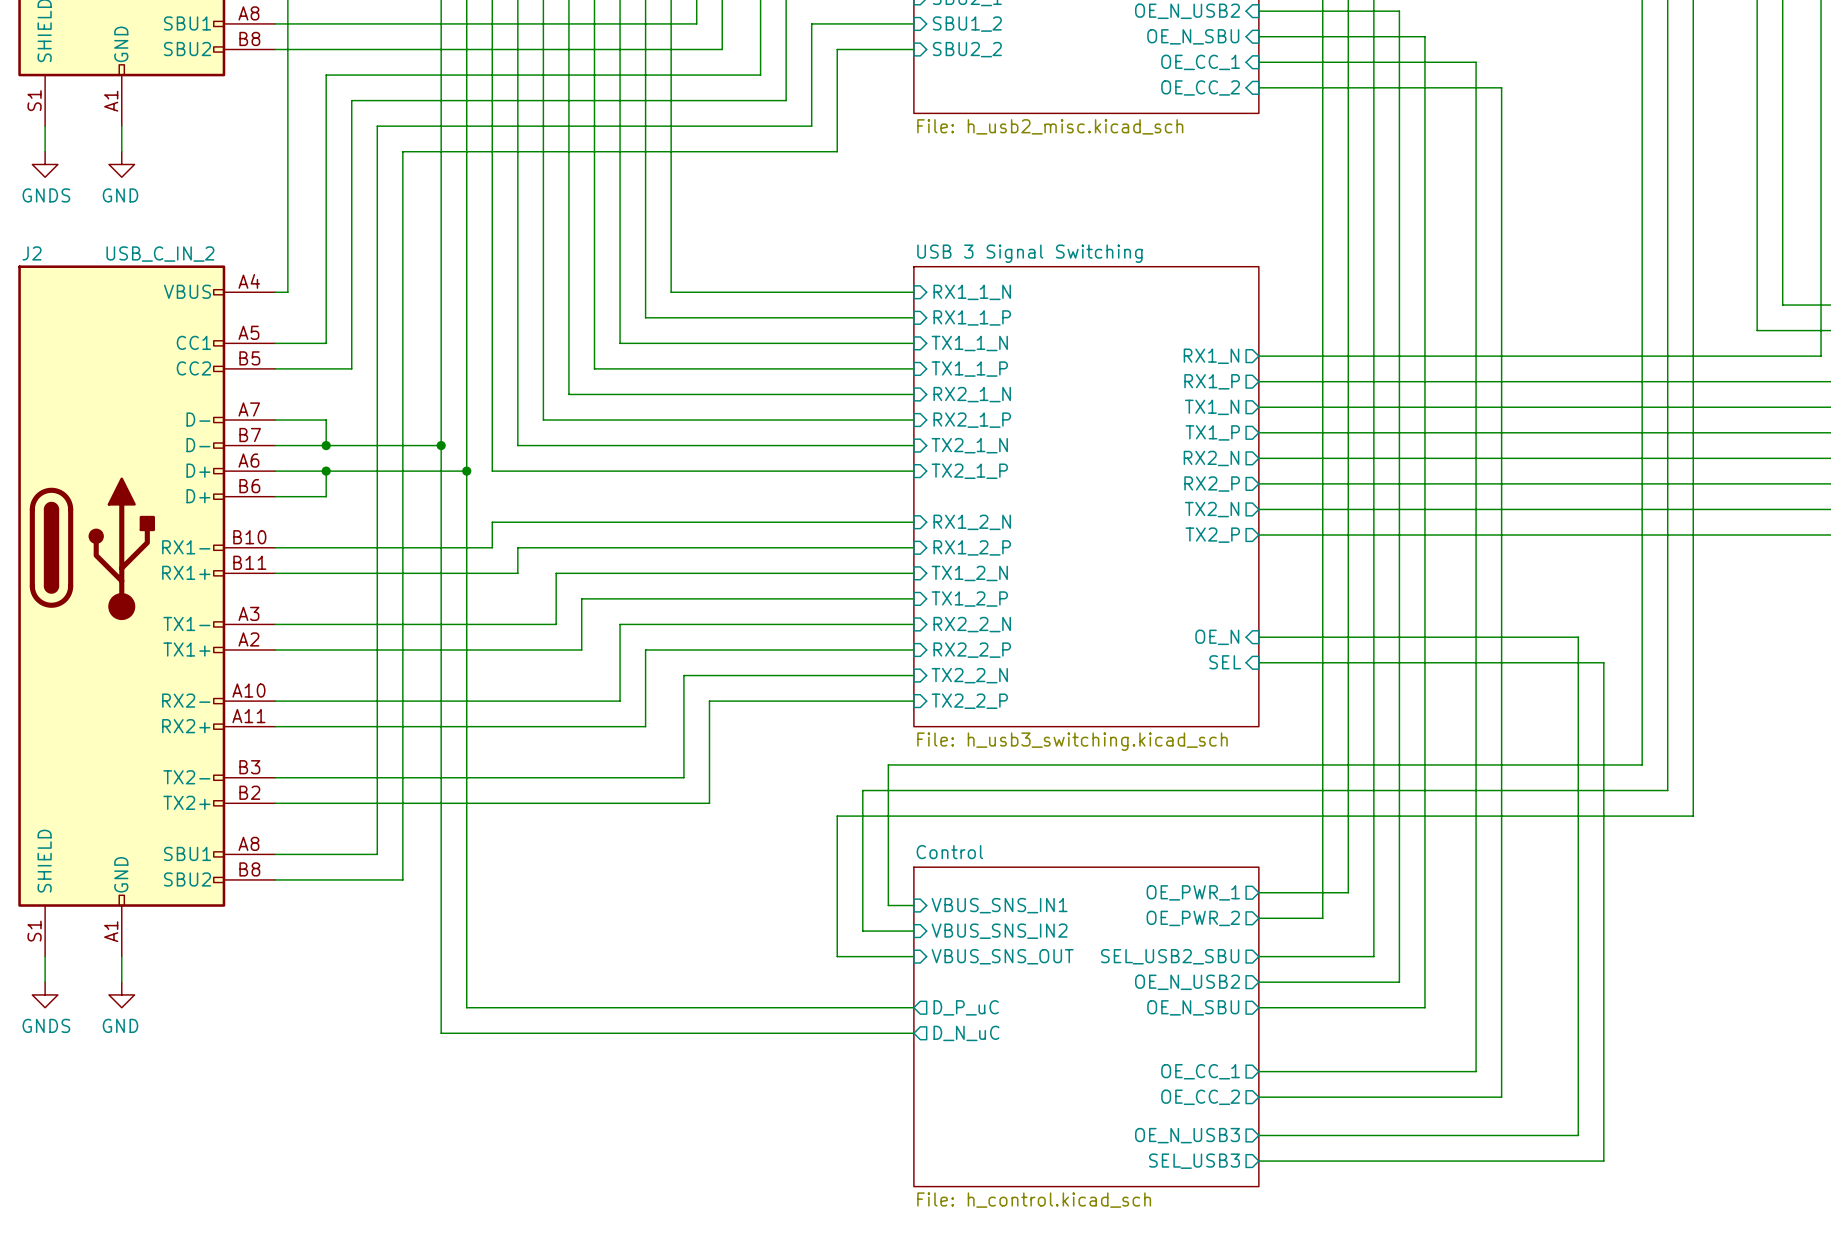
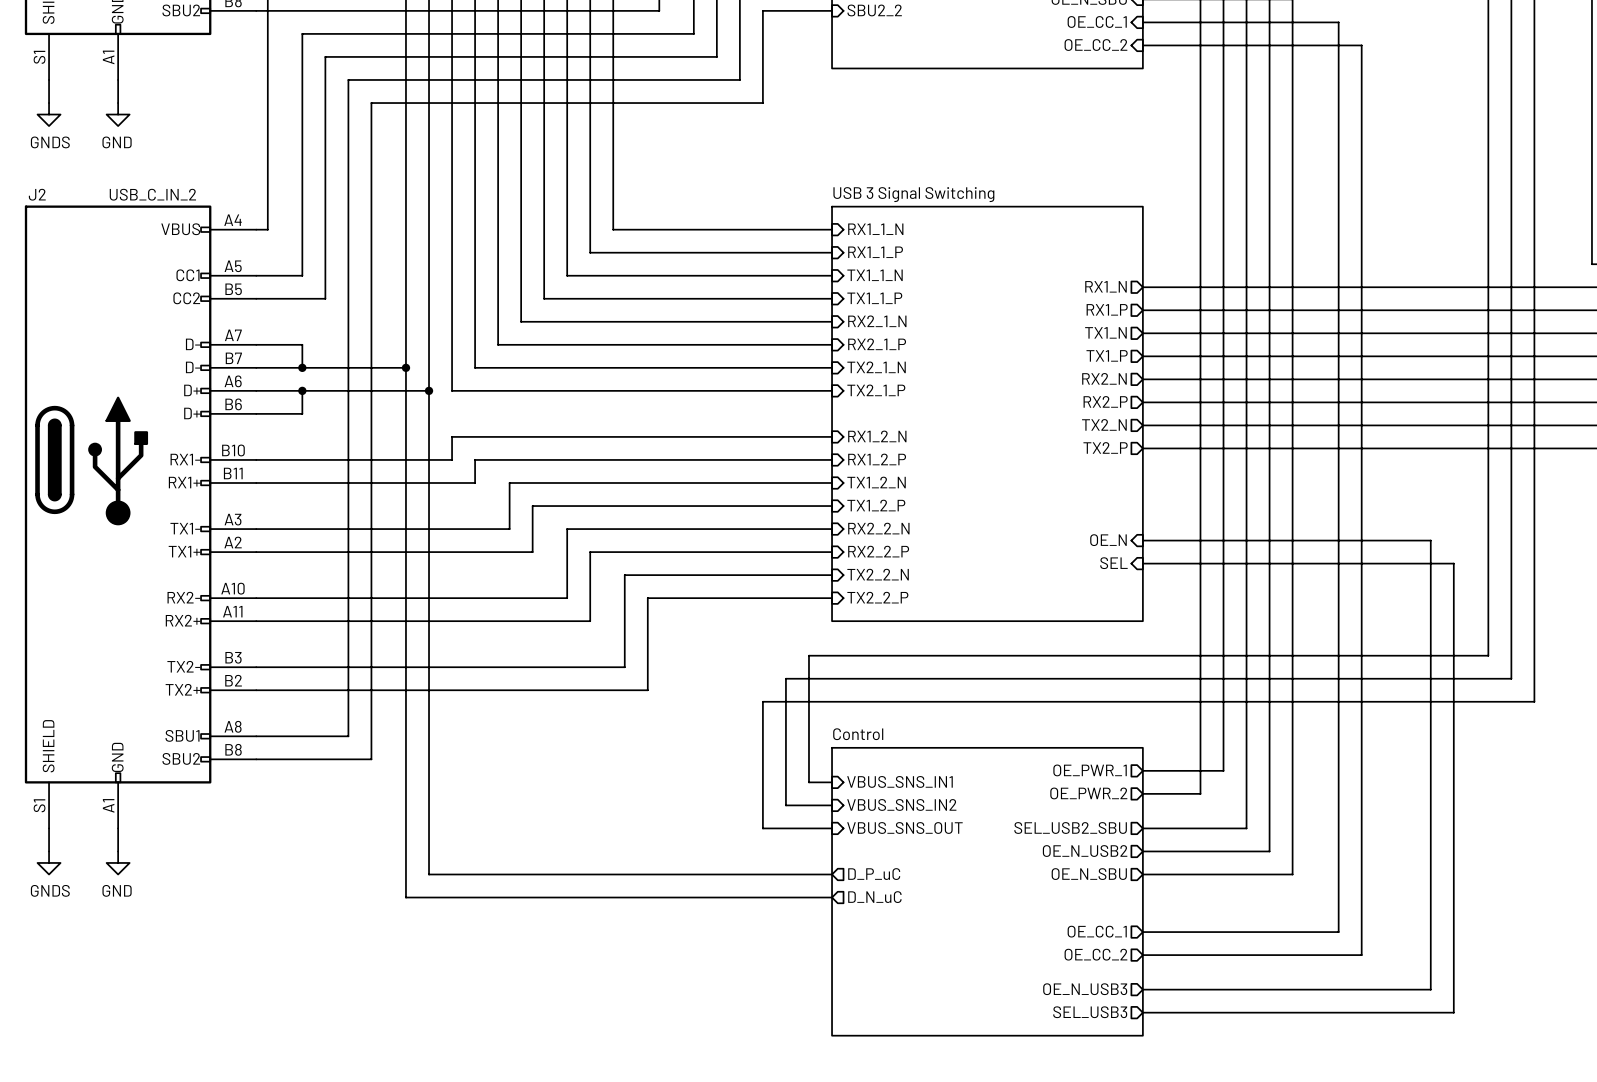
sheet value: File: h_usb2_misc.kicad_sch (1050, 126) -> none
sheet USB 3 Signal Switching value: File: h_usb3_switching.kicad_sch (1072, 741) -> none
sheet Control value: File: h_control.kicad_sch (1034, 1200) -> none

